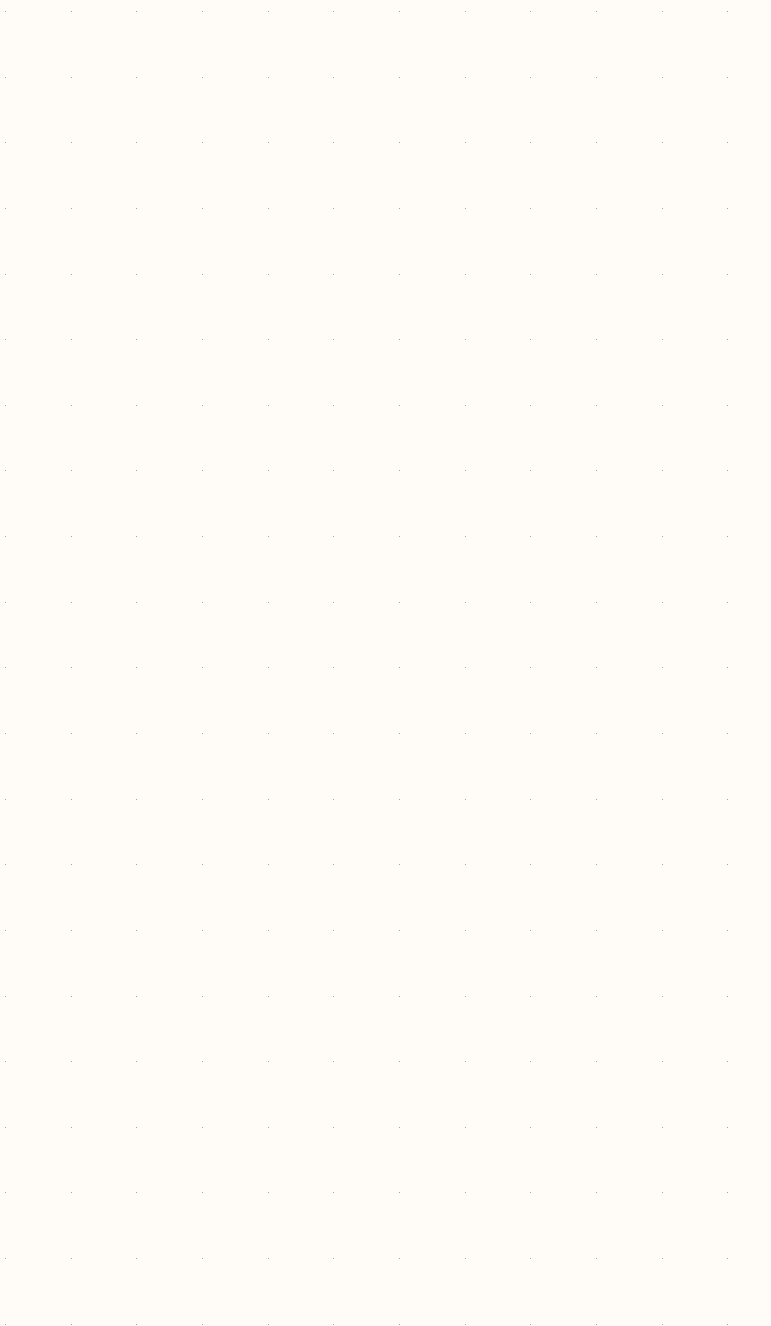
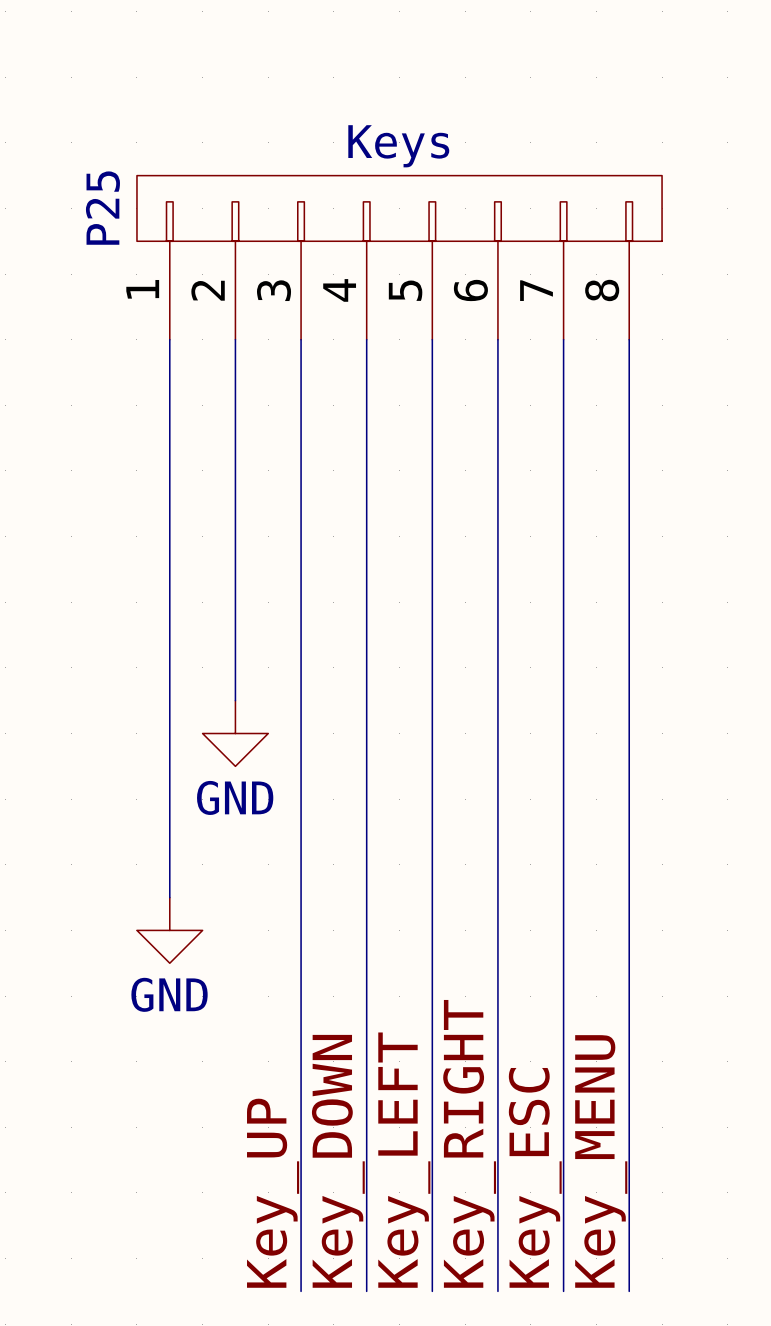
P25: none -> Keys (399, 257)
wire: none -> (169, 339) (169, 897)
wire: none -> (235, 339) (235, 700)
wire: none -> (301, 339) (301, 1291)
wire: none -> (366, 339) (366, 1291)
wire: none -> (432, 339) (432, 1291)
wire: none -> (497, 339) (497, 1291)
wire: none -> (563, 339) (563, 1291)
wire: none -> (629, 339) (629, 1291)
power symbol: none -> GND (235, 733)
power symbol: none -> GND (169, 930)
label: none -> Key_RIGHT (469, 1143)
label: none -> Key_LEFT (404, 1160)
label: none -> Key_DOWN (338, 1161)
label: none -> Key_MENU (601, 1161)
label: none -> Key_ESC (535, 1177)
label: none -> Key_UP (273, 1193)

